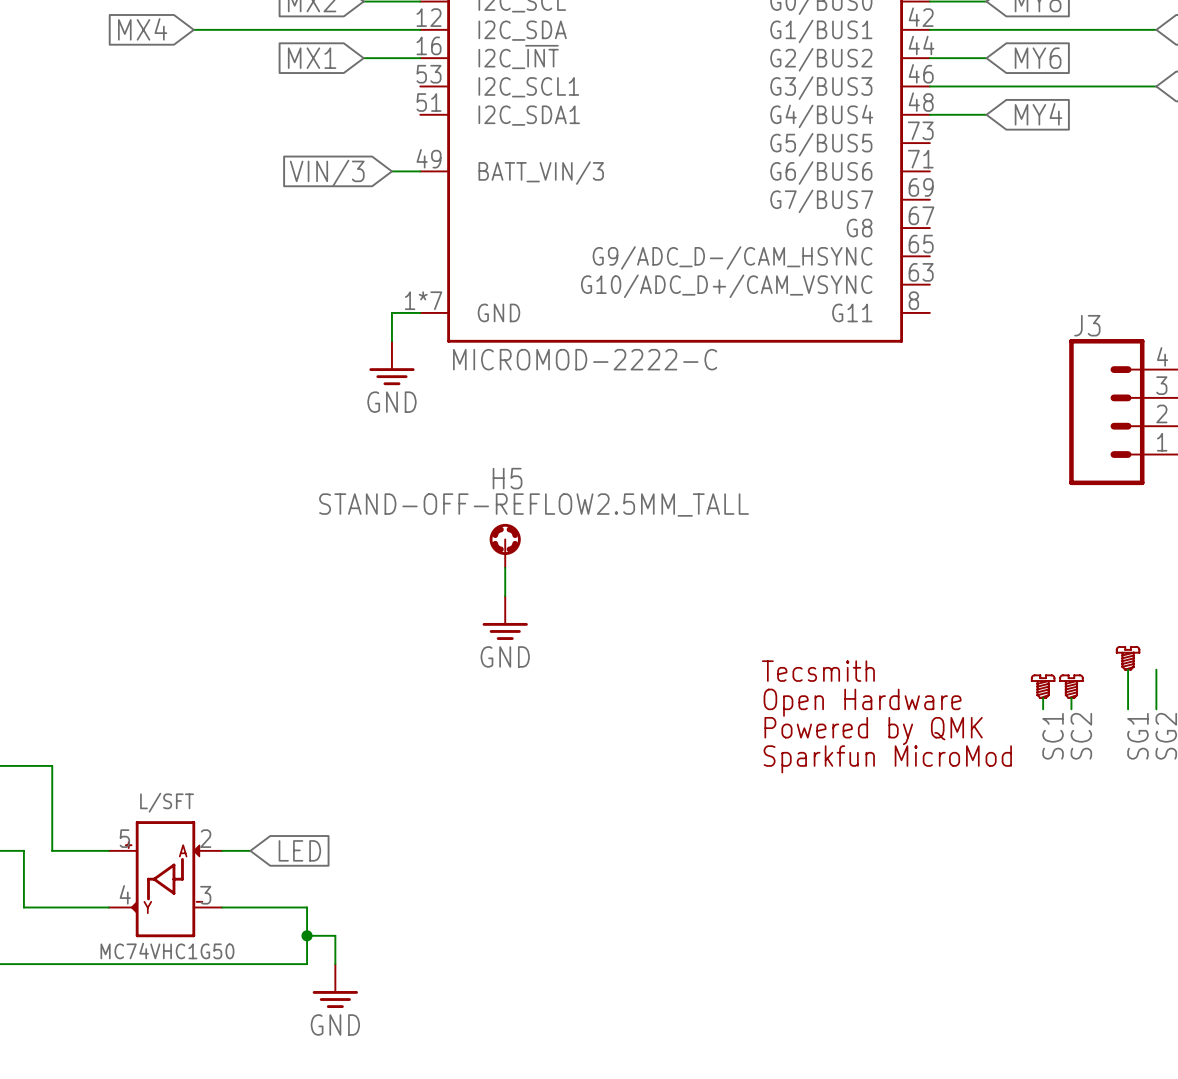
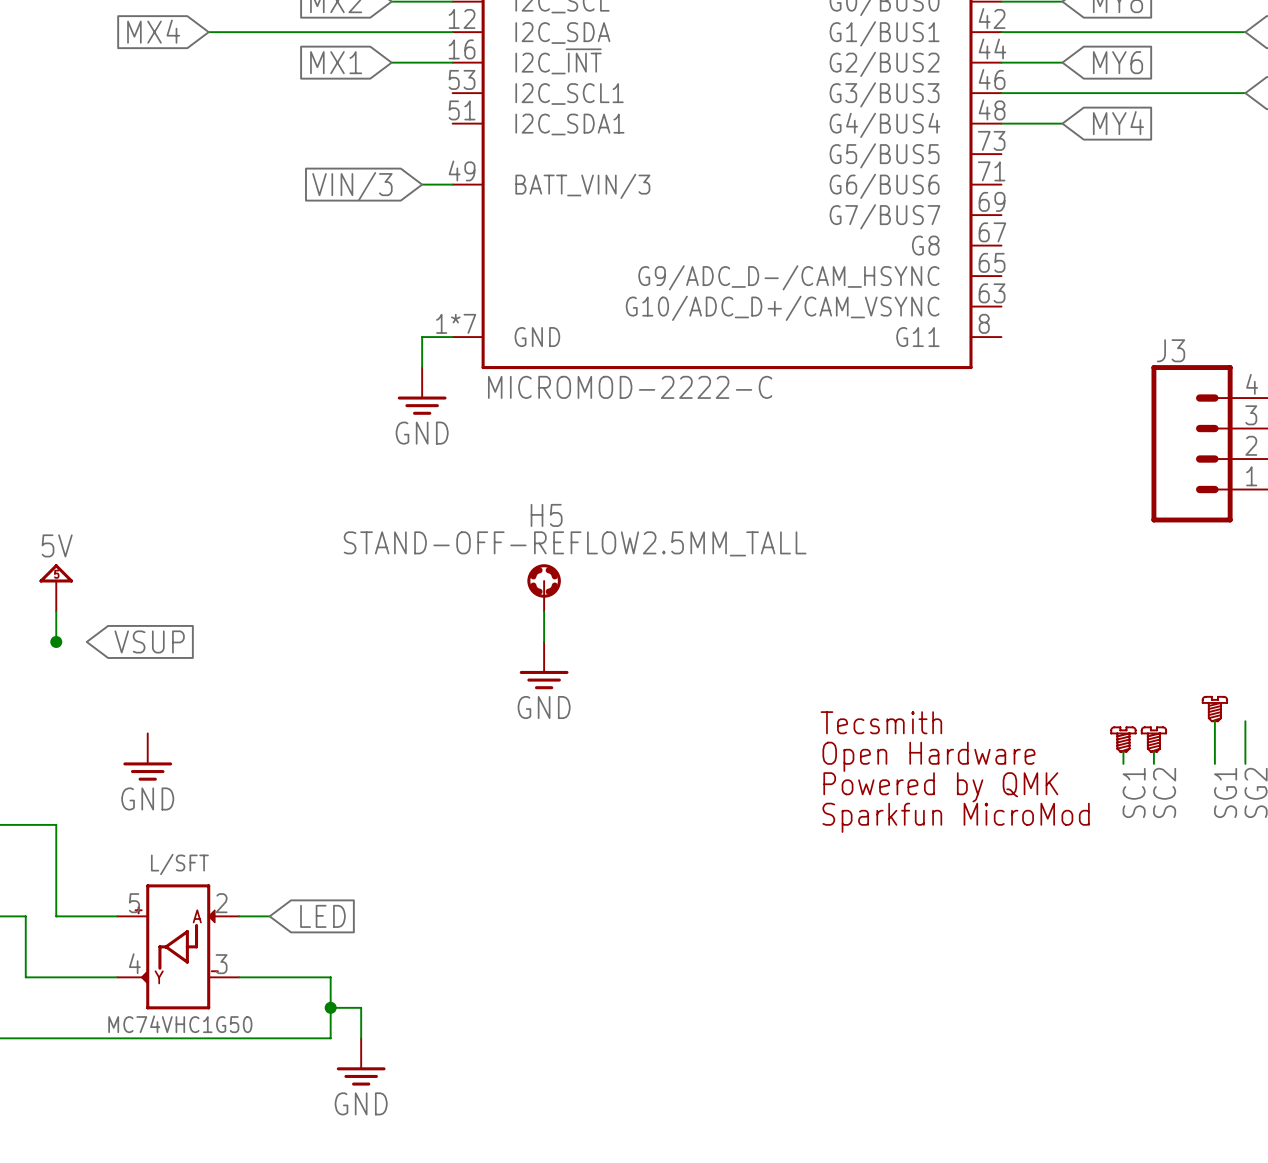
power symbol: none -> 5V (56, 587)
wire: none -> (56, 611) (56, 641)
junction: none -> (56, 641)
global label: none -> VSUP (149, 641)
power symbol: none -> GND (147, 757)

